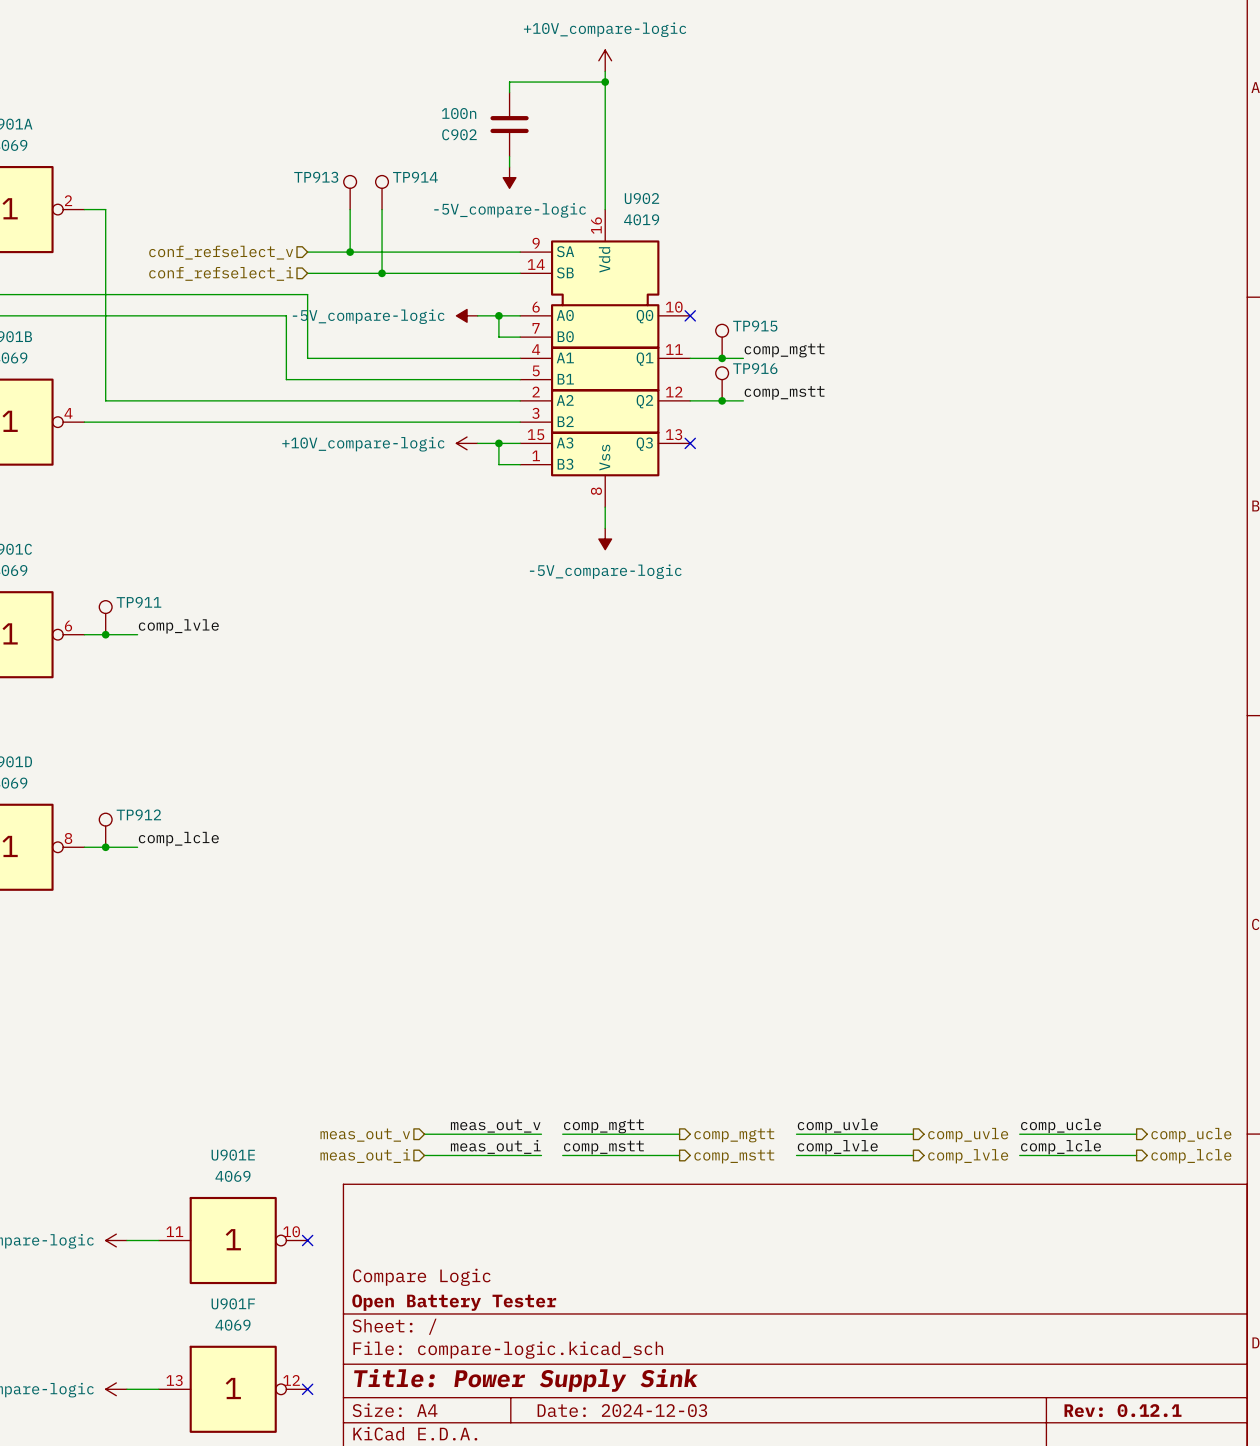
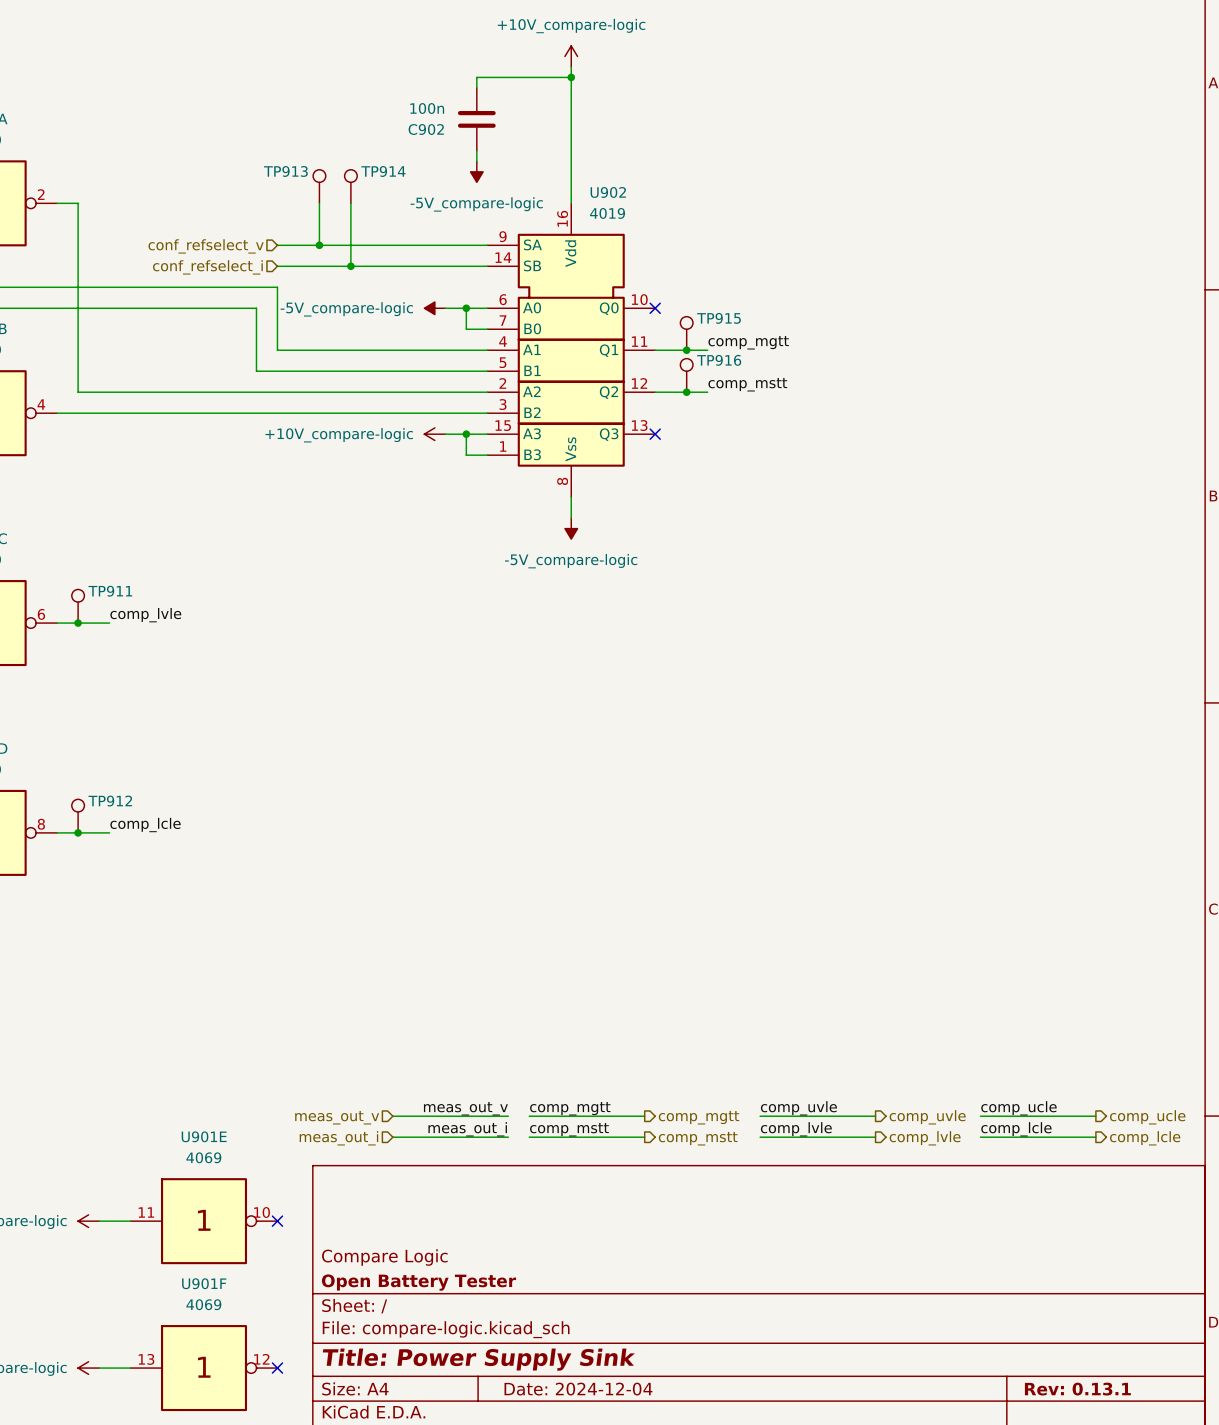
title block: Date: 2024-12-03 (622, 1410) -> Date: 2024-12-04 (578, 1389)
title block: Rev: 0.12.1 (1123, 1410) -> Rev: 0.13.1 (1077, 1389)

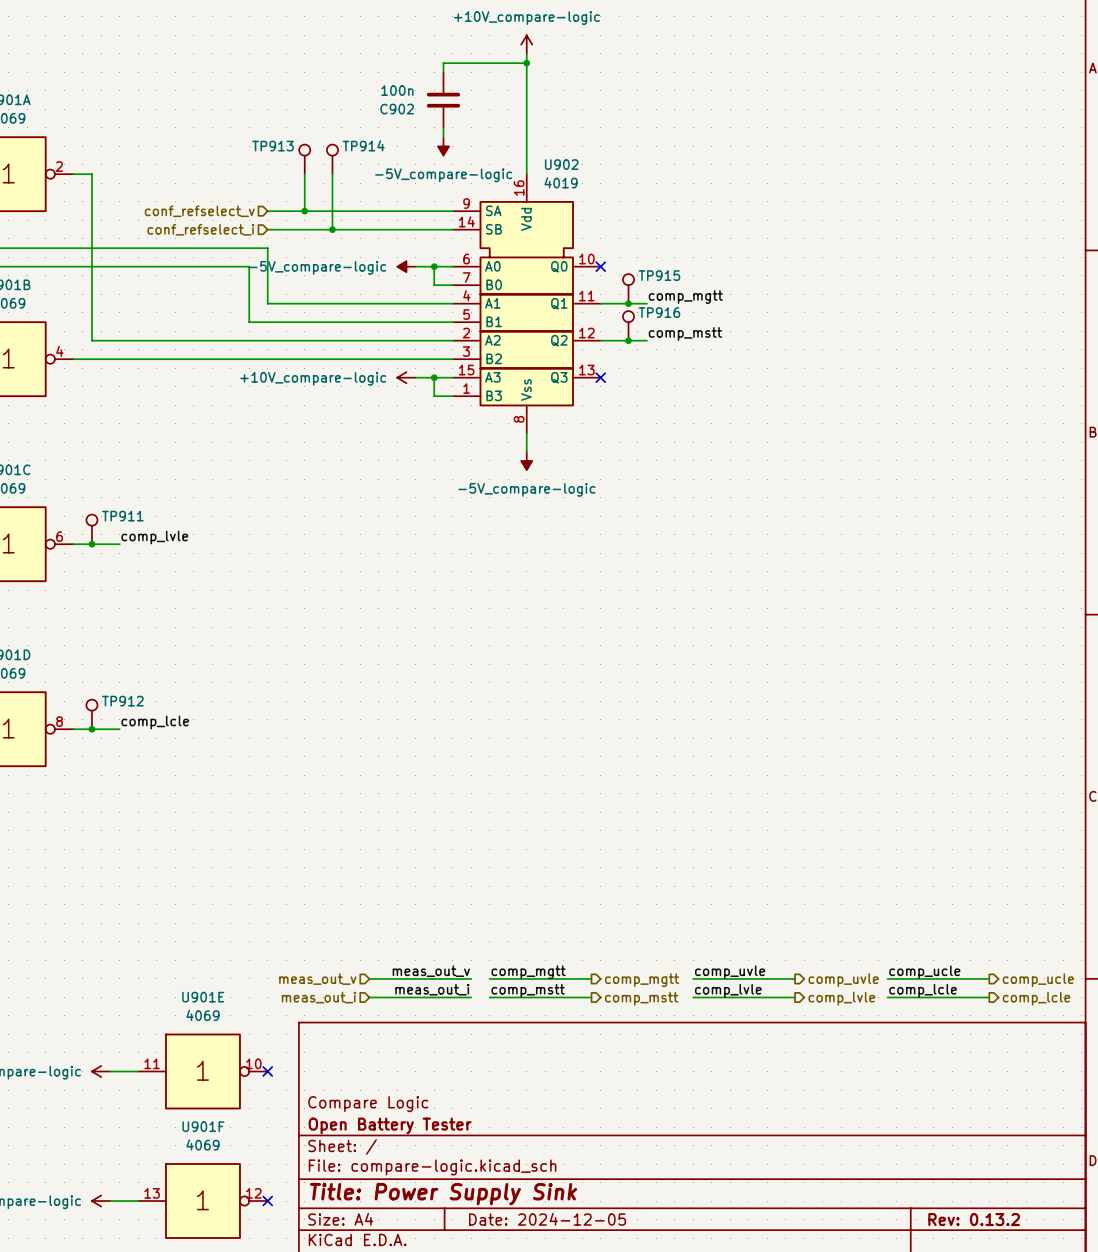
title block: Date: 2024-12-04 (578, 1389) -> Date: 2024-12-05 (547, 1219)
title block: Rev: 0.13.1 (1077, 1389) -> Rev: 0.13.2 (974, 1219)

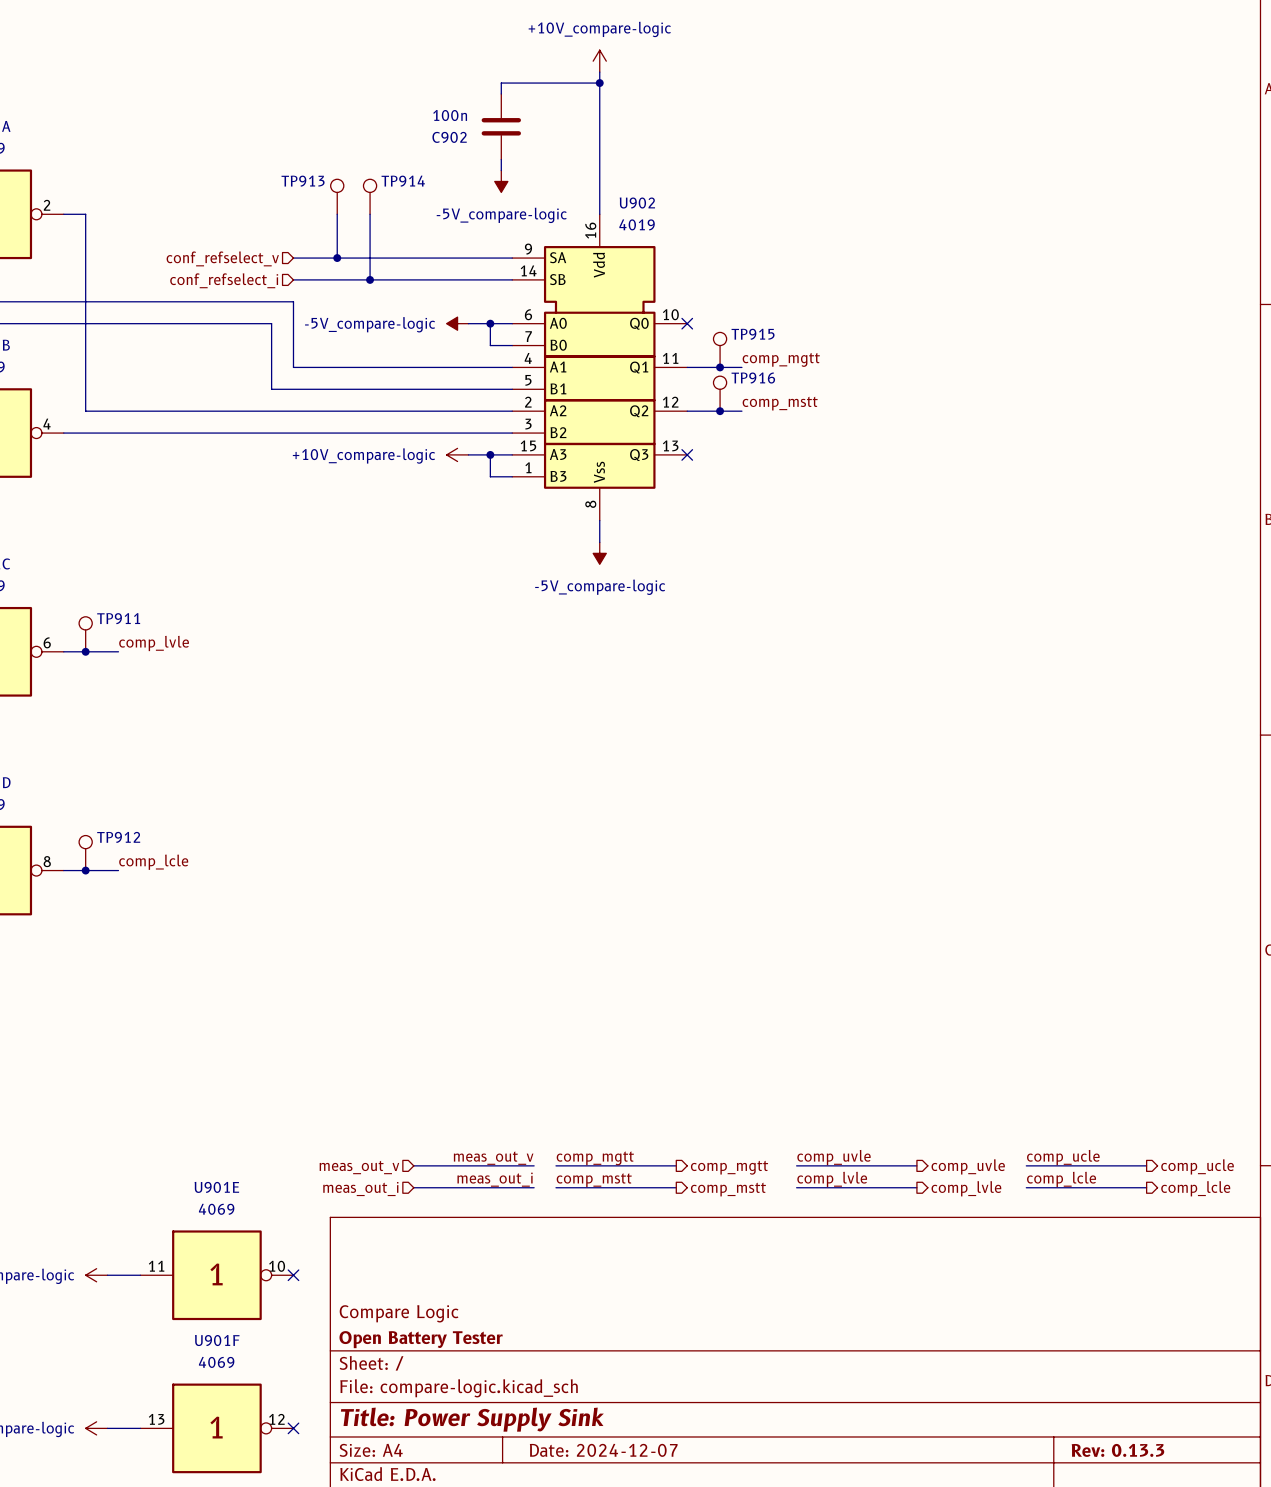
title block: Date: 2024-12-05 (547, 1219) -> Date: 2024-12-07 (603, 1450)
title block: Rev: 0.13.2 (974, 1219) -> Rev: 0.13.3 (1117, 1450)

